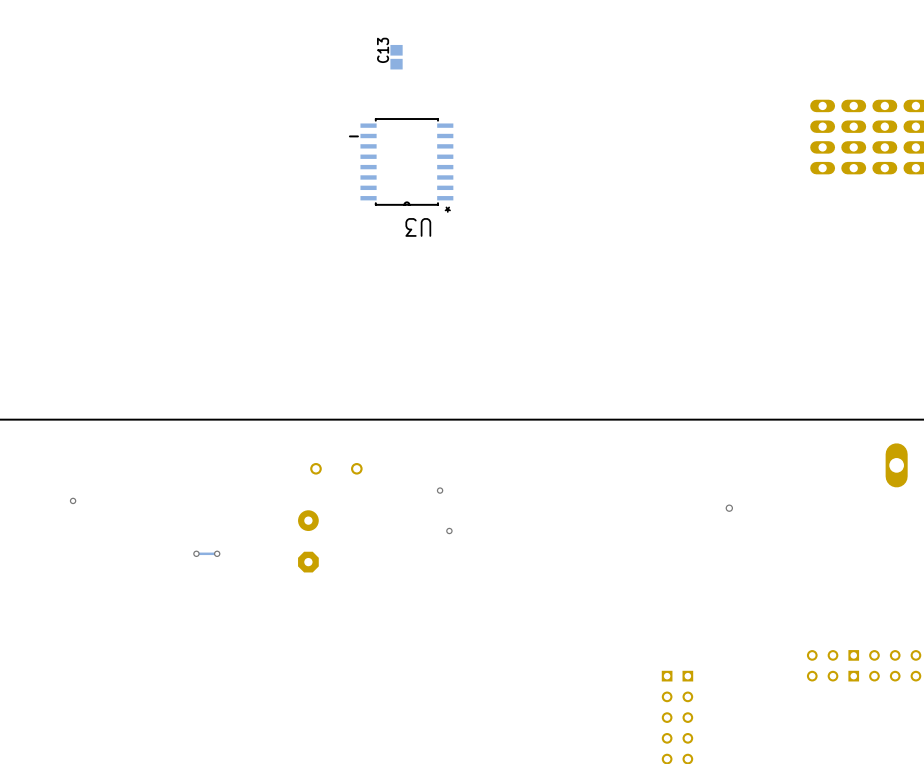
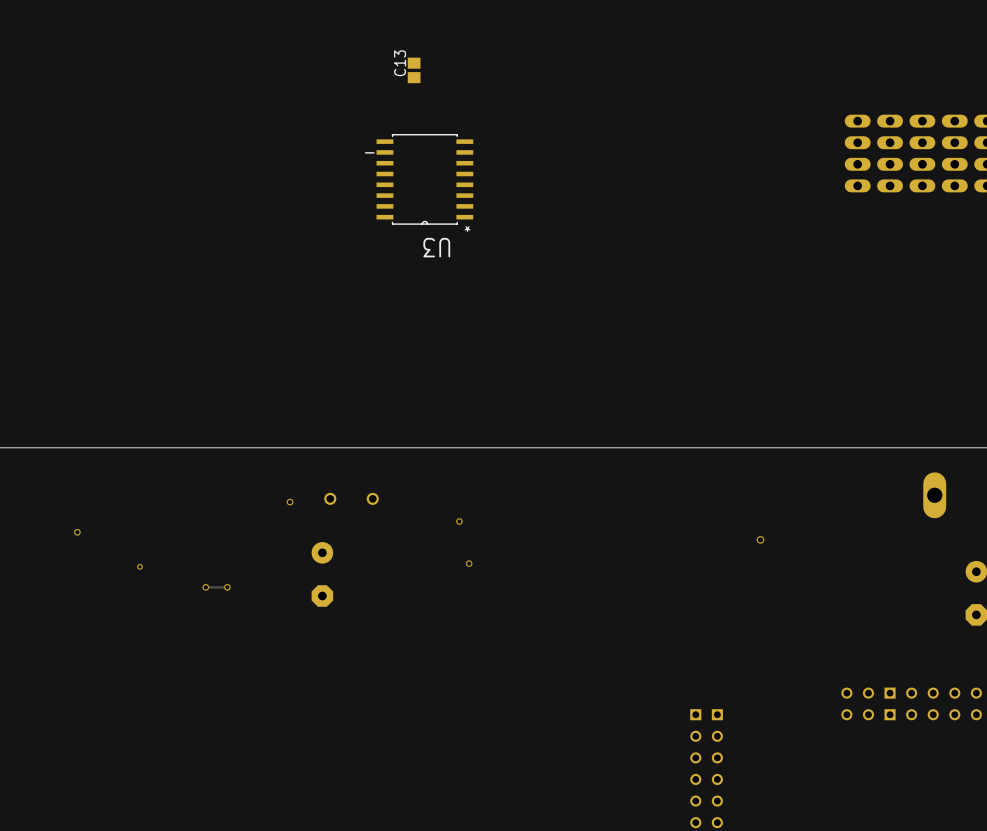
via: none -> (290, 502)
via: none -> (139, 566)

